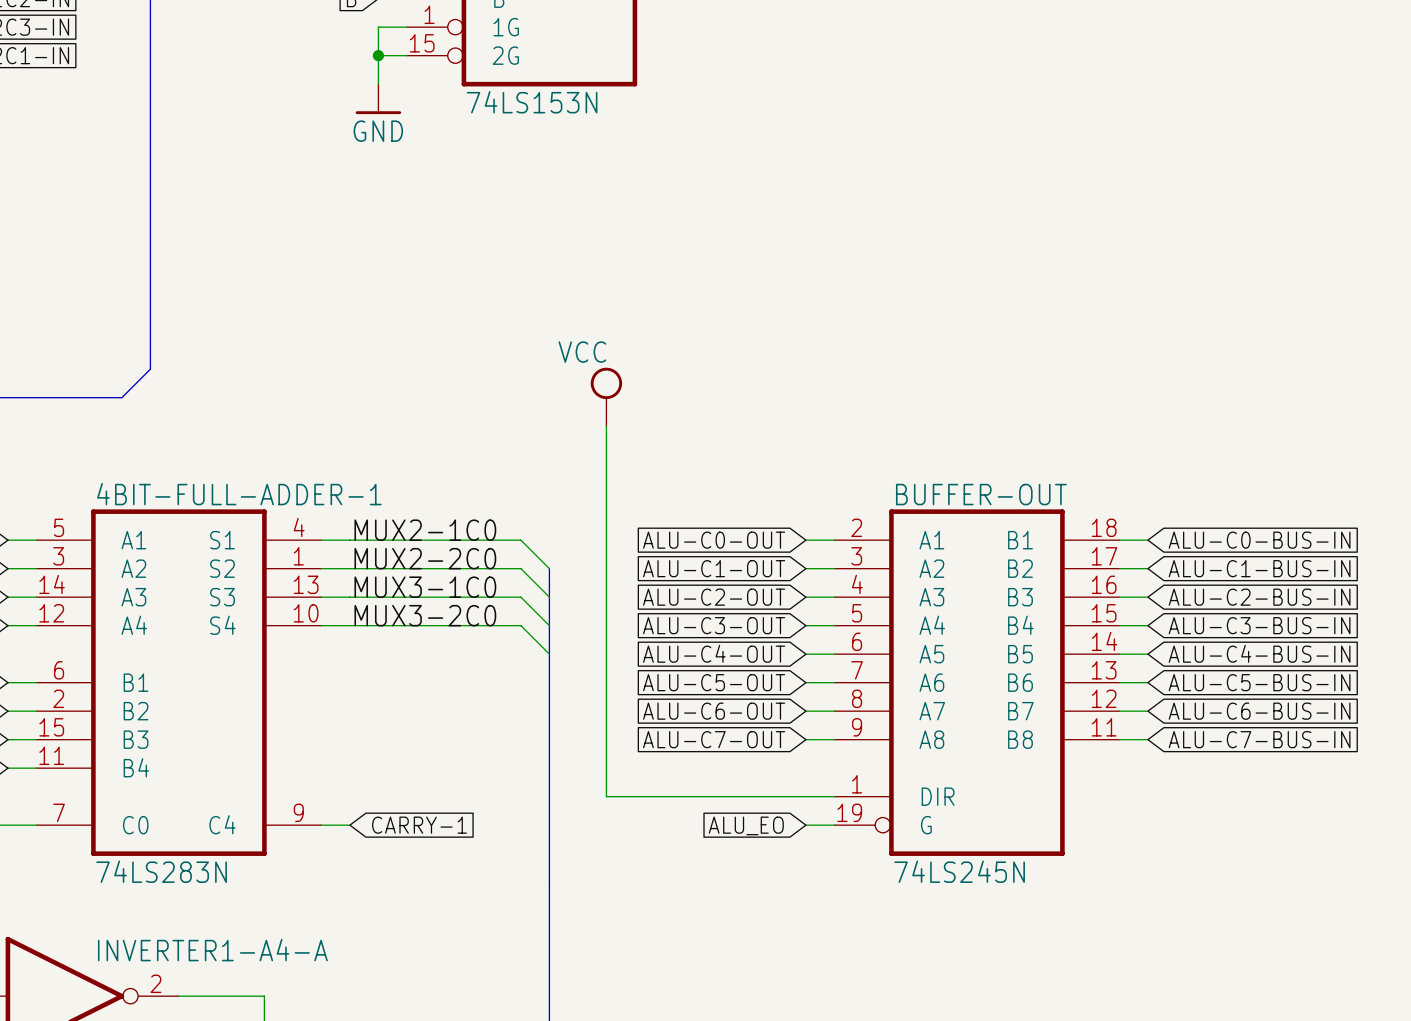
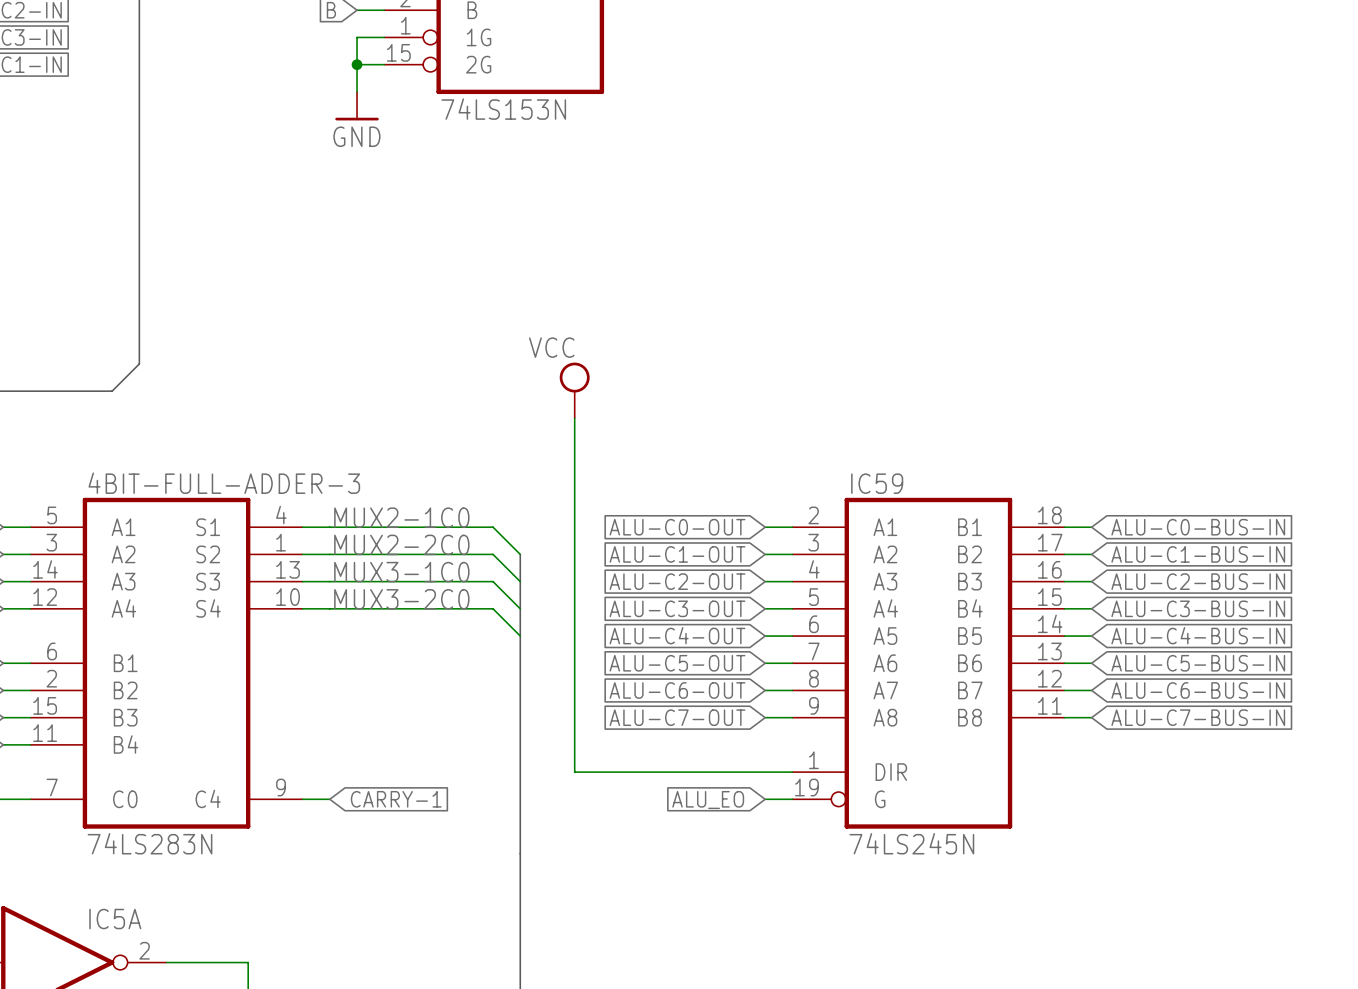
4BIT-FULL-ADDER-1 name: 4BIT-FULL-ADDER-1 (239, 494) -> 4BIT-FULL-ADDER-3 (224, 483)
BUFFER-OUT name: BUFFER-OUT (981, 494) -> IC59 (877, 483)
INVERTER1-A4-A name: INVERTER1-A4-A (212, 950) -> IC5A (115, 919)

